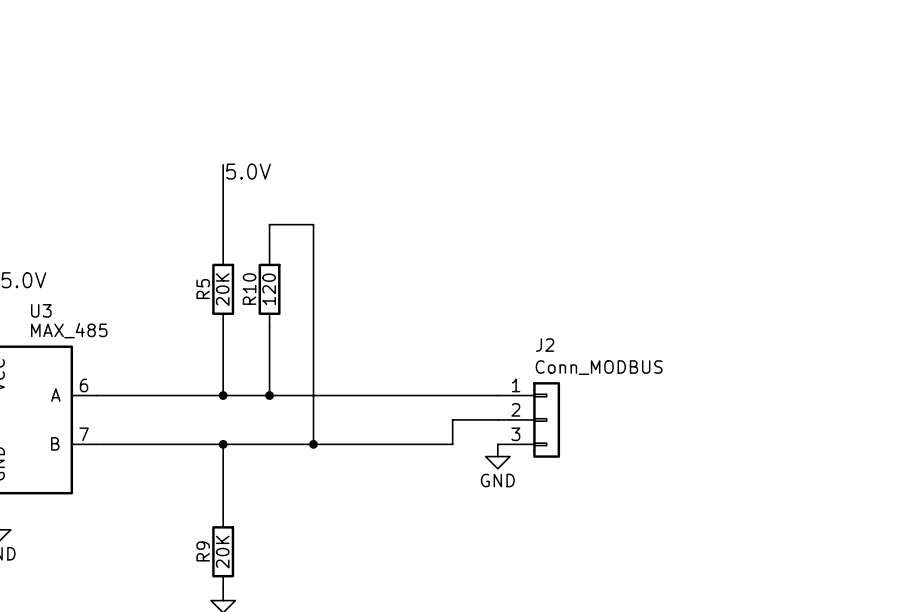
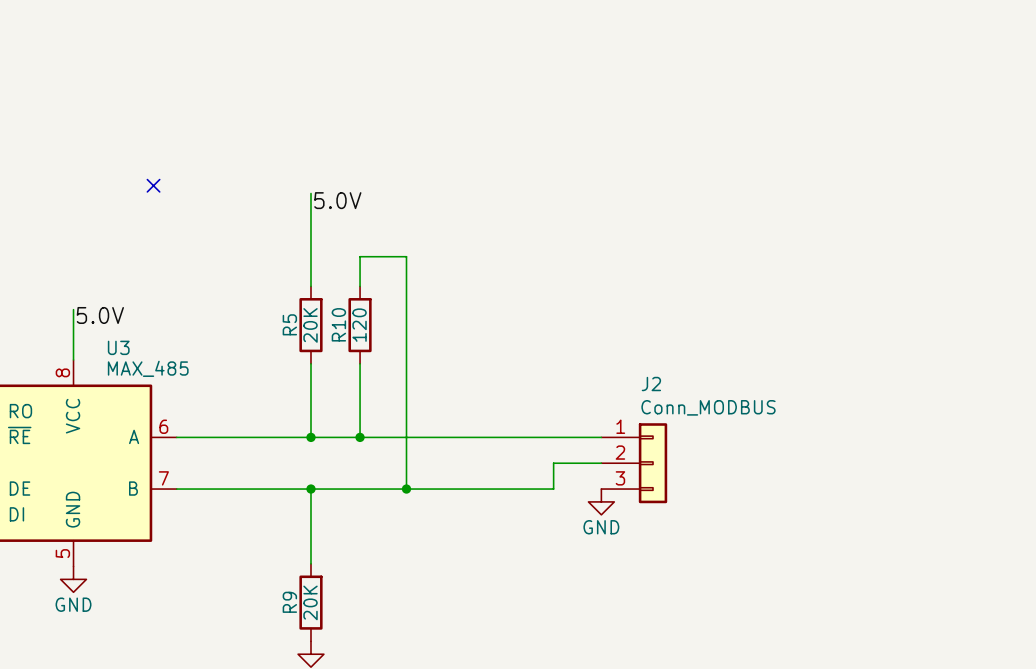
no-connect mark: none -> (153, 185)

